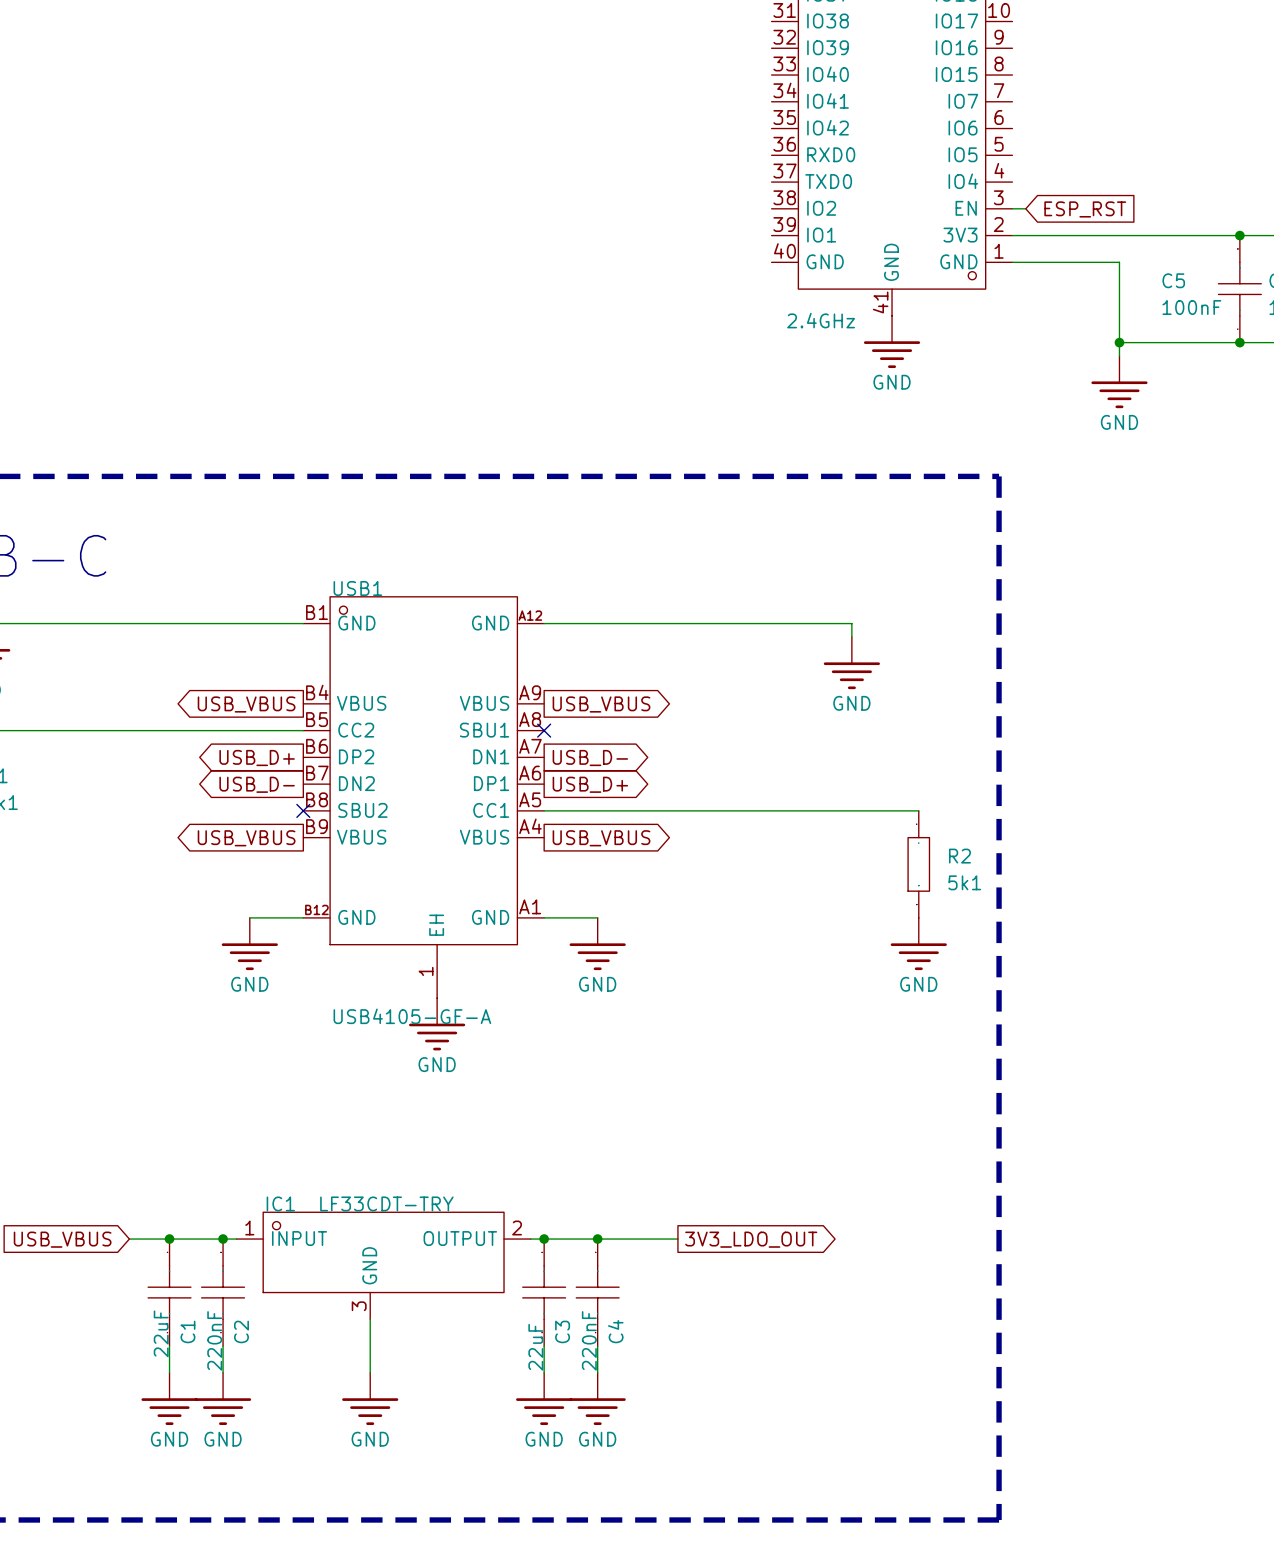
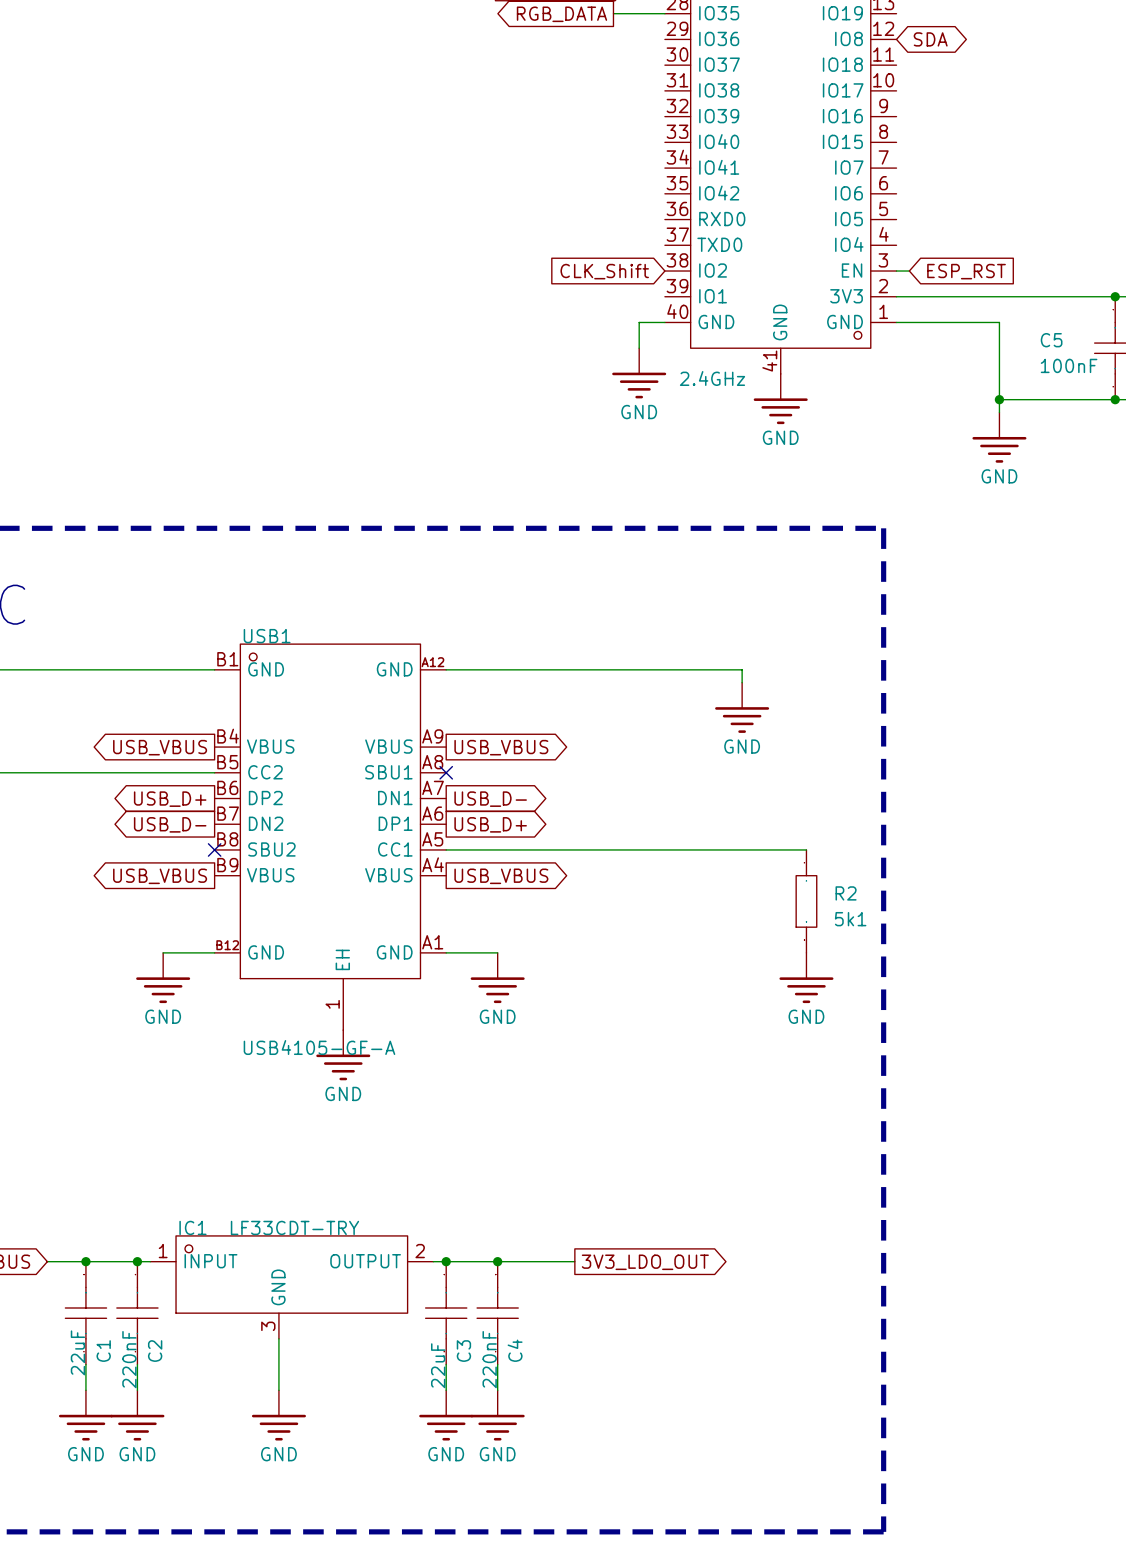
global label: none -> CLK_Shift (604, 271)
wire: none -> (664, 322) (639, 322) (639, 348)
power symbol: none -> GND (639, 373)

